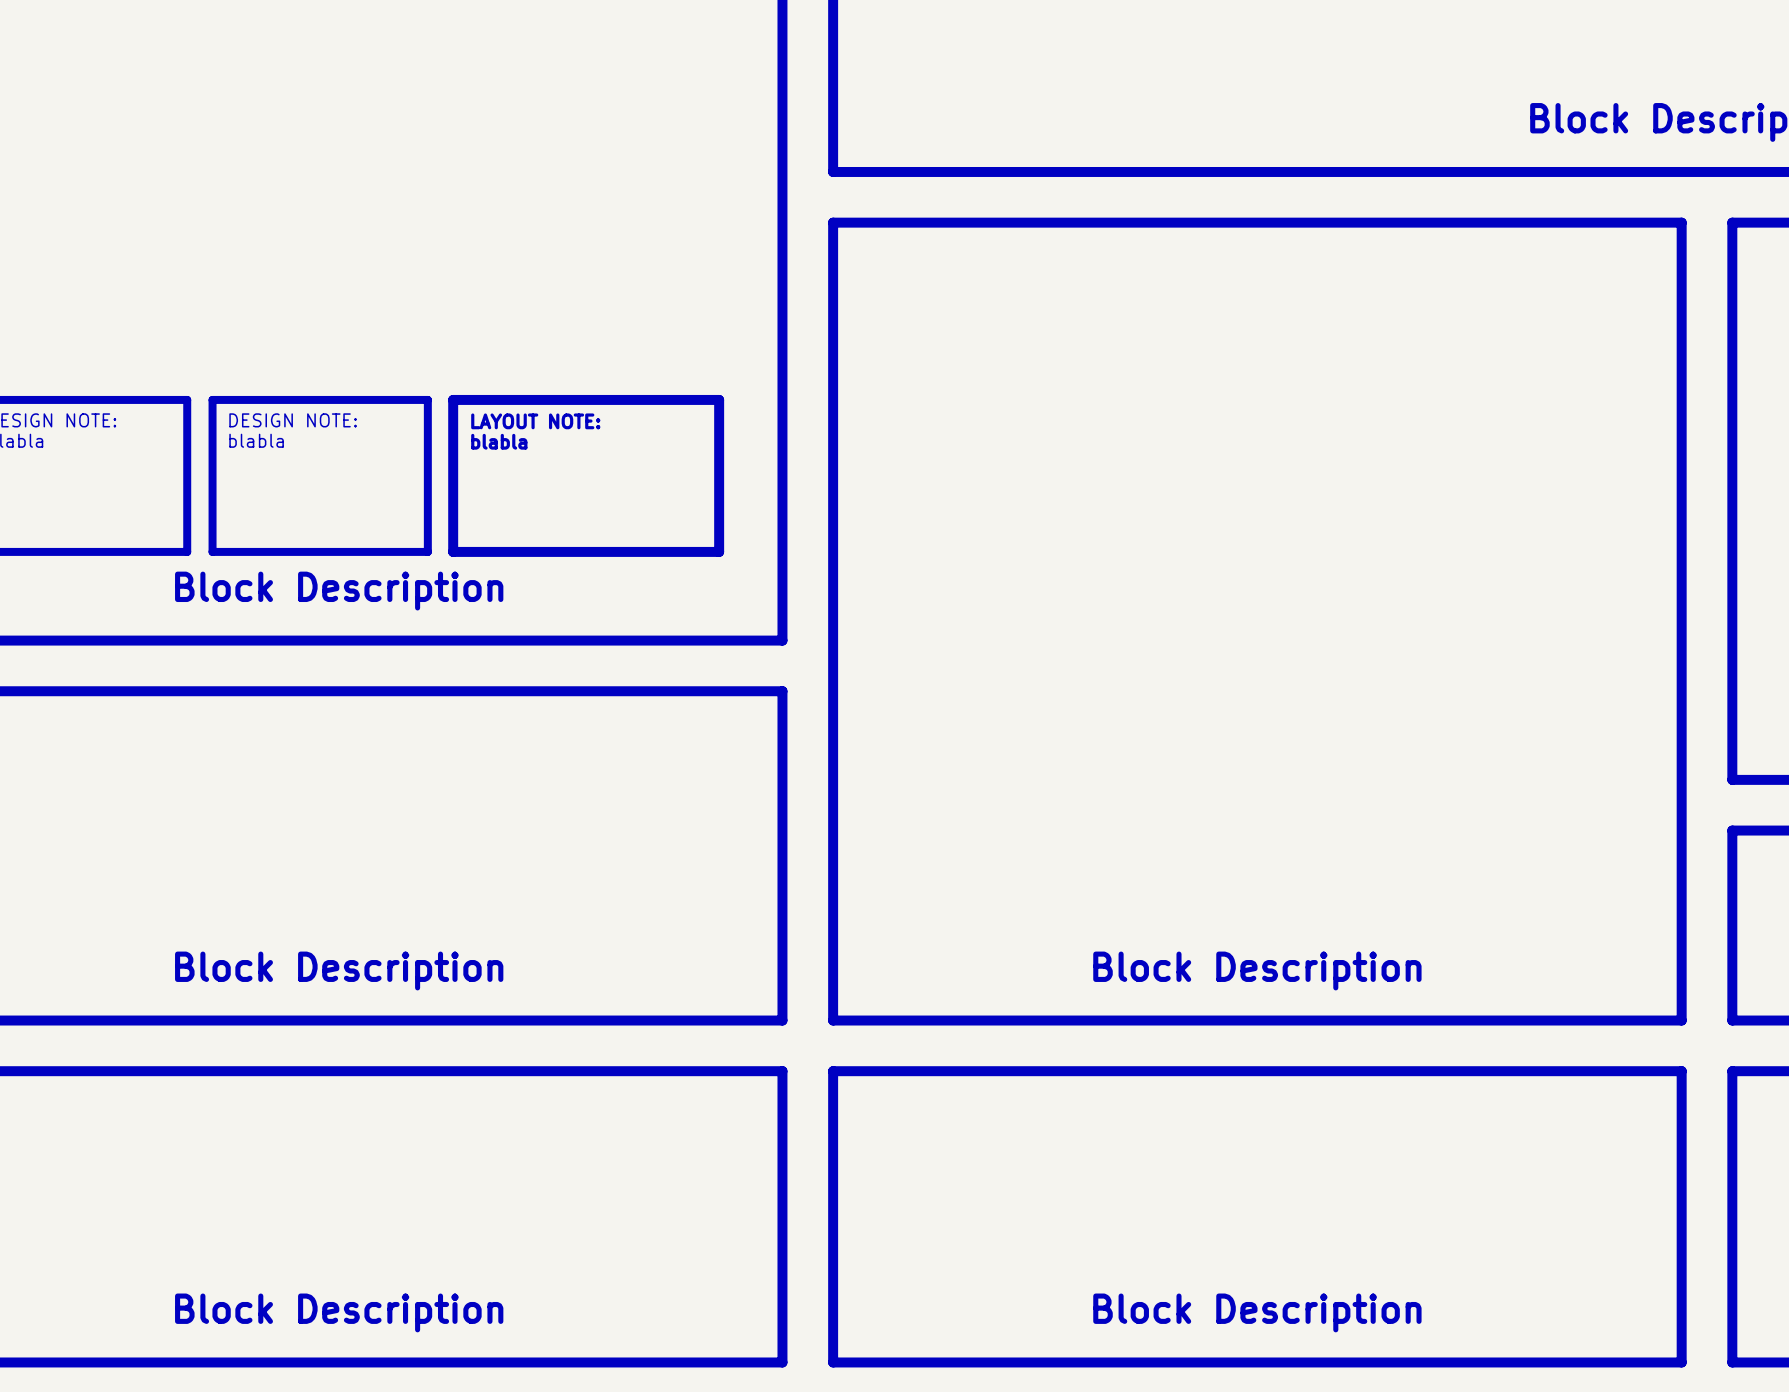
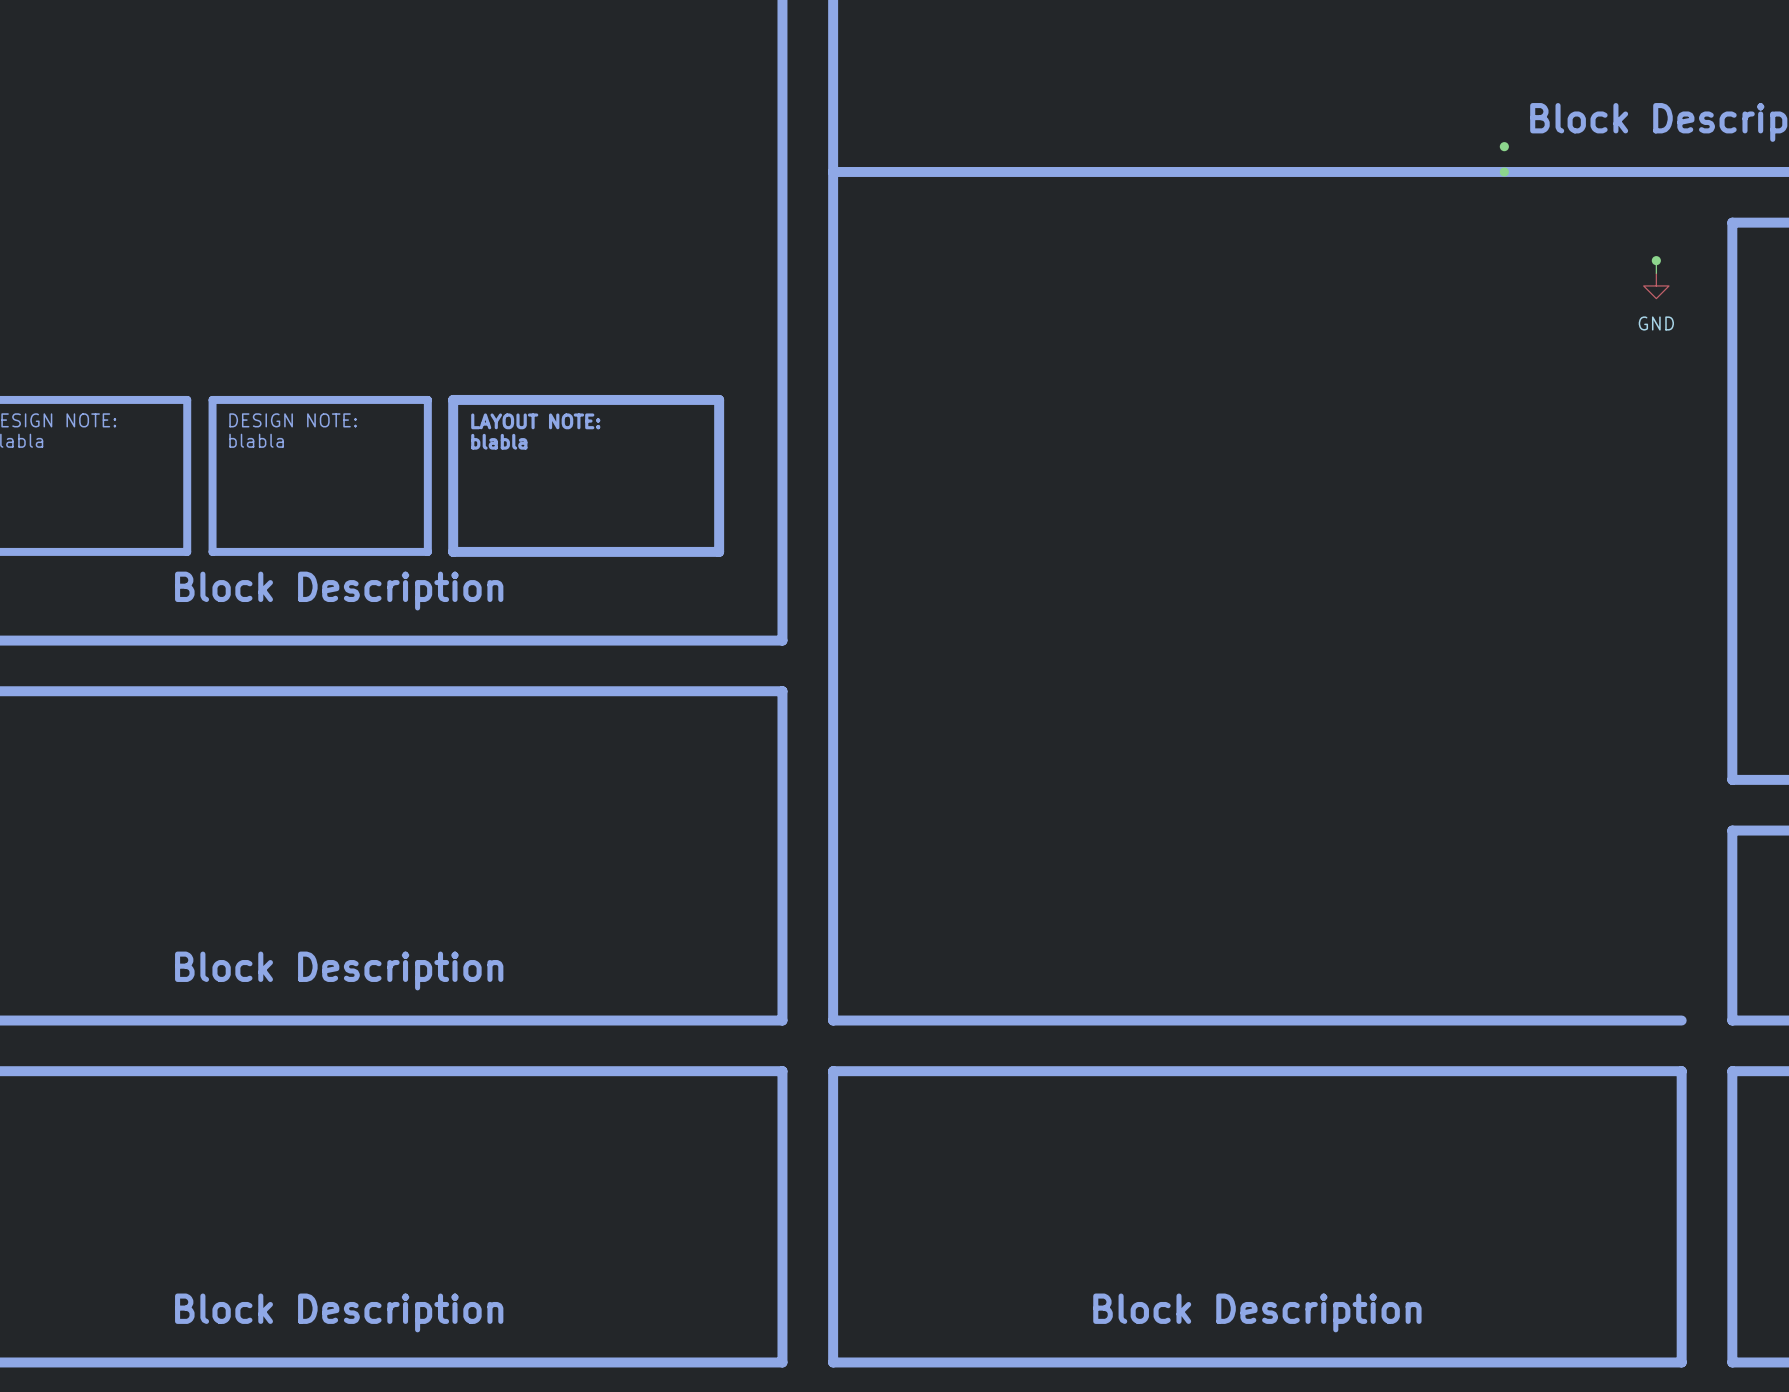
junction: none -> (1504, 146)
junction: none -> (1504, 171)
line: (833, 222) (1681, 222) (1681, 1020) -> (833, 222) (833, 171)
wire: none -> (1656, 260) (1656, 273)
junction: none -> (1656, 260)
power symbol: none -> GND (1656, 285)
text: Block Description (1257, 970) -> none

